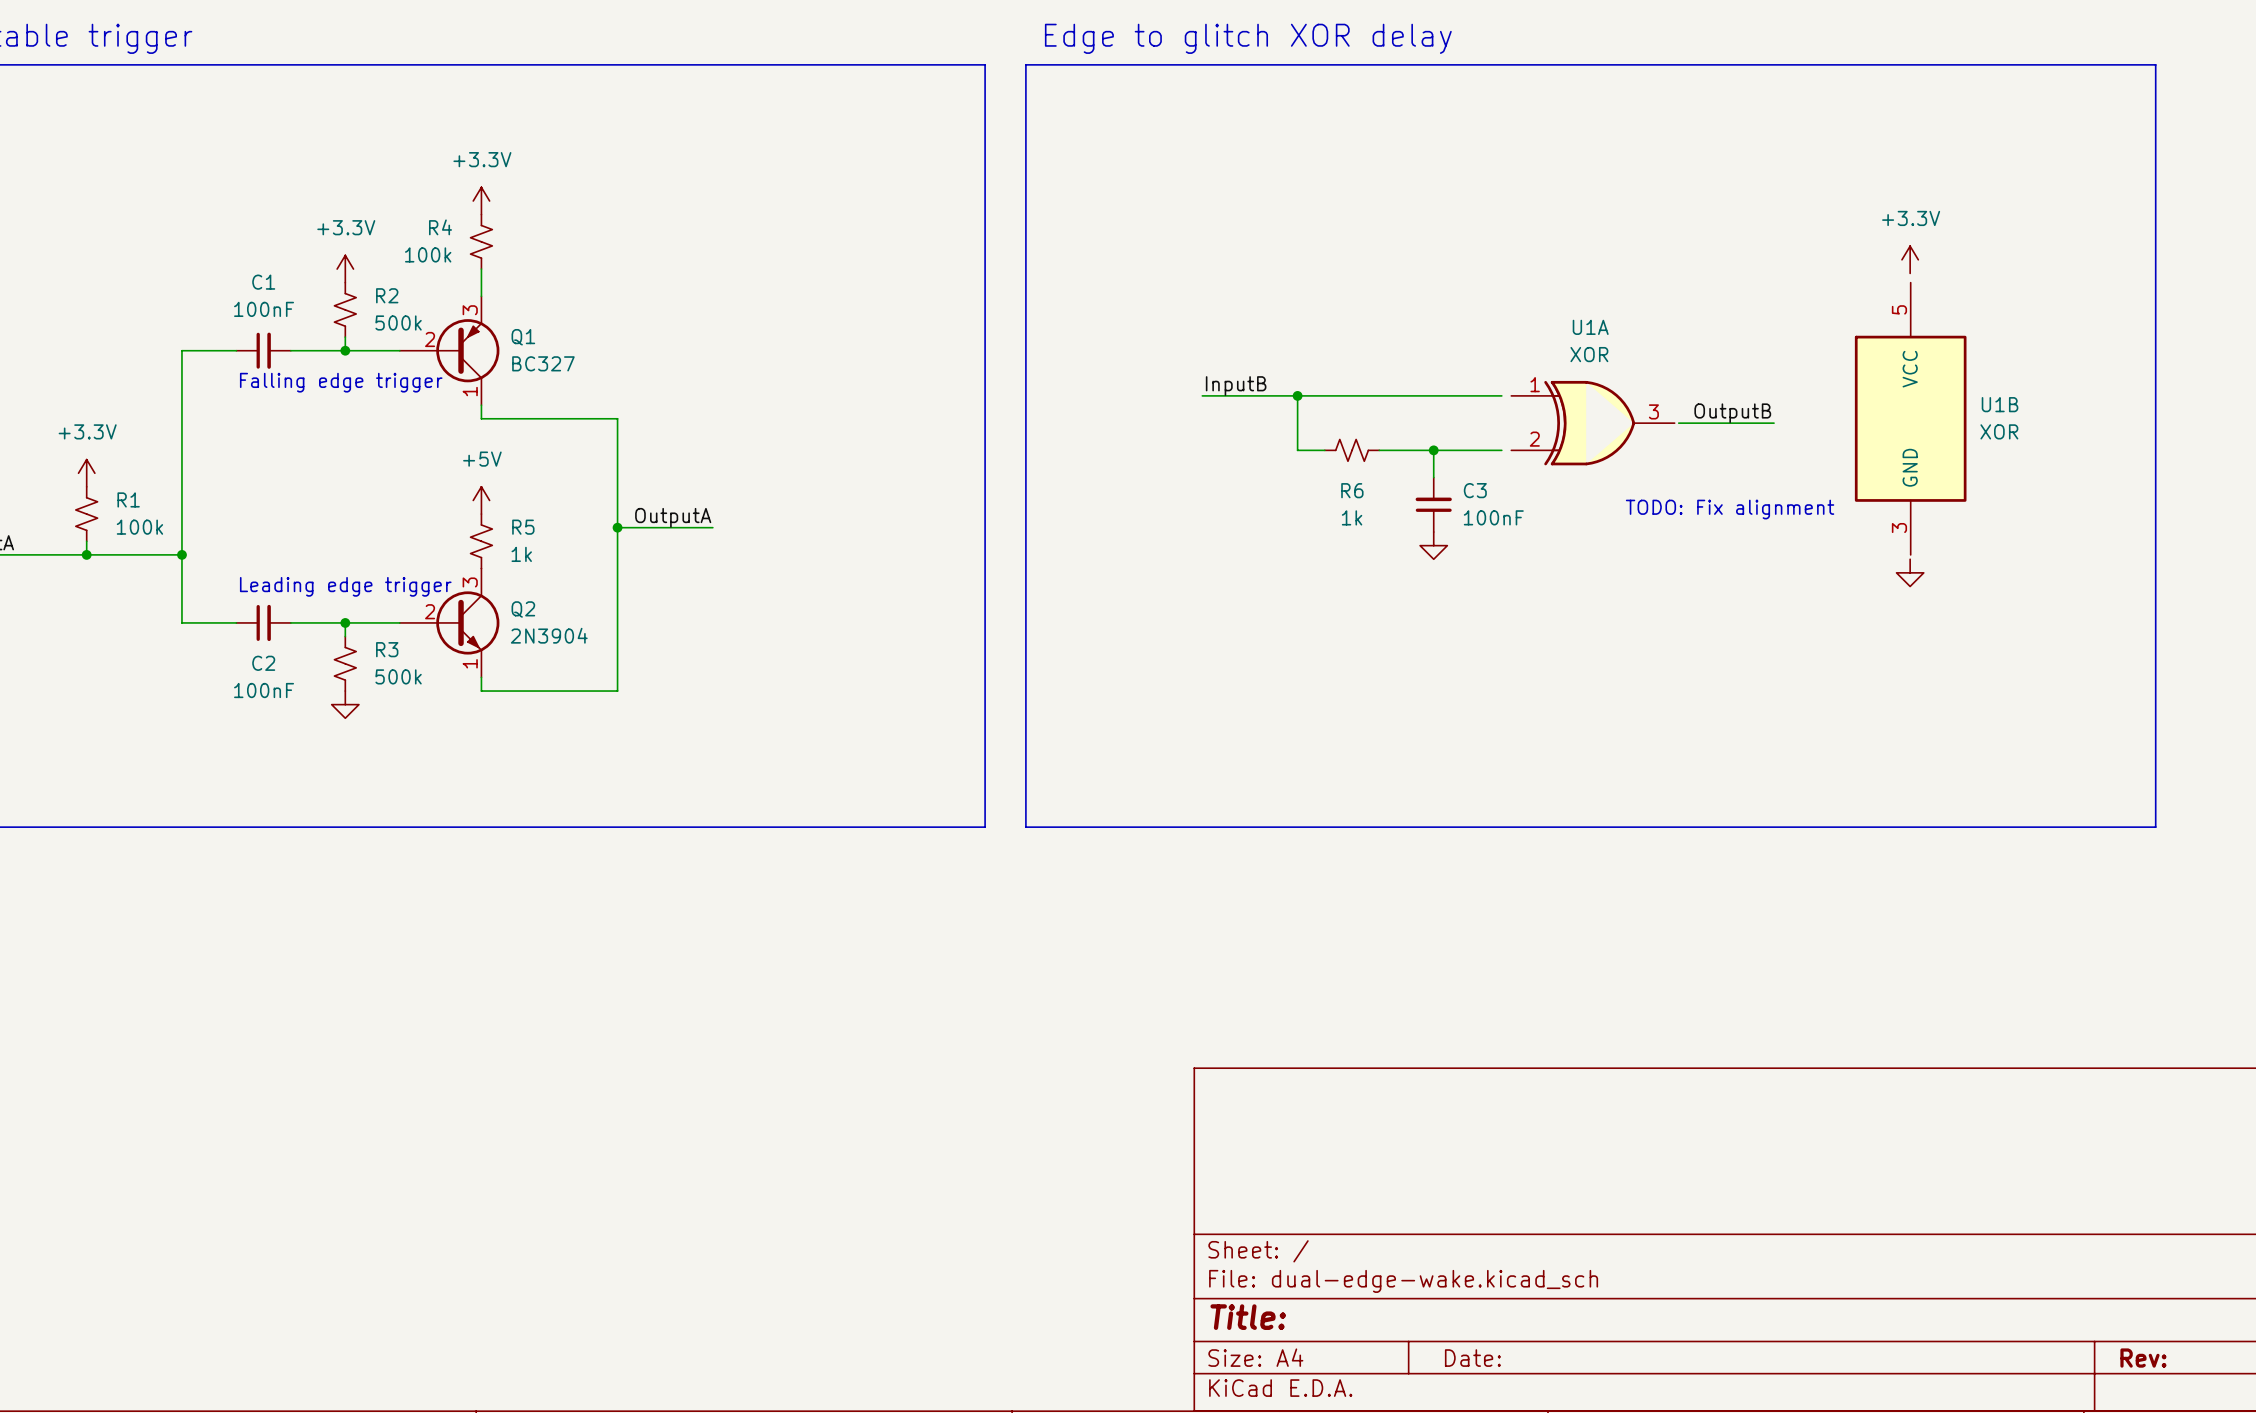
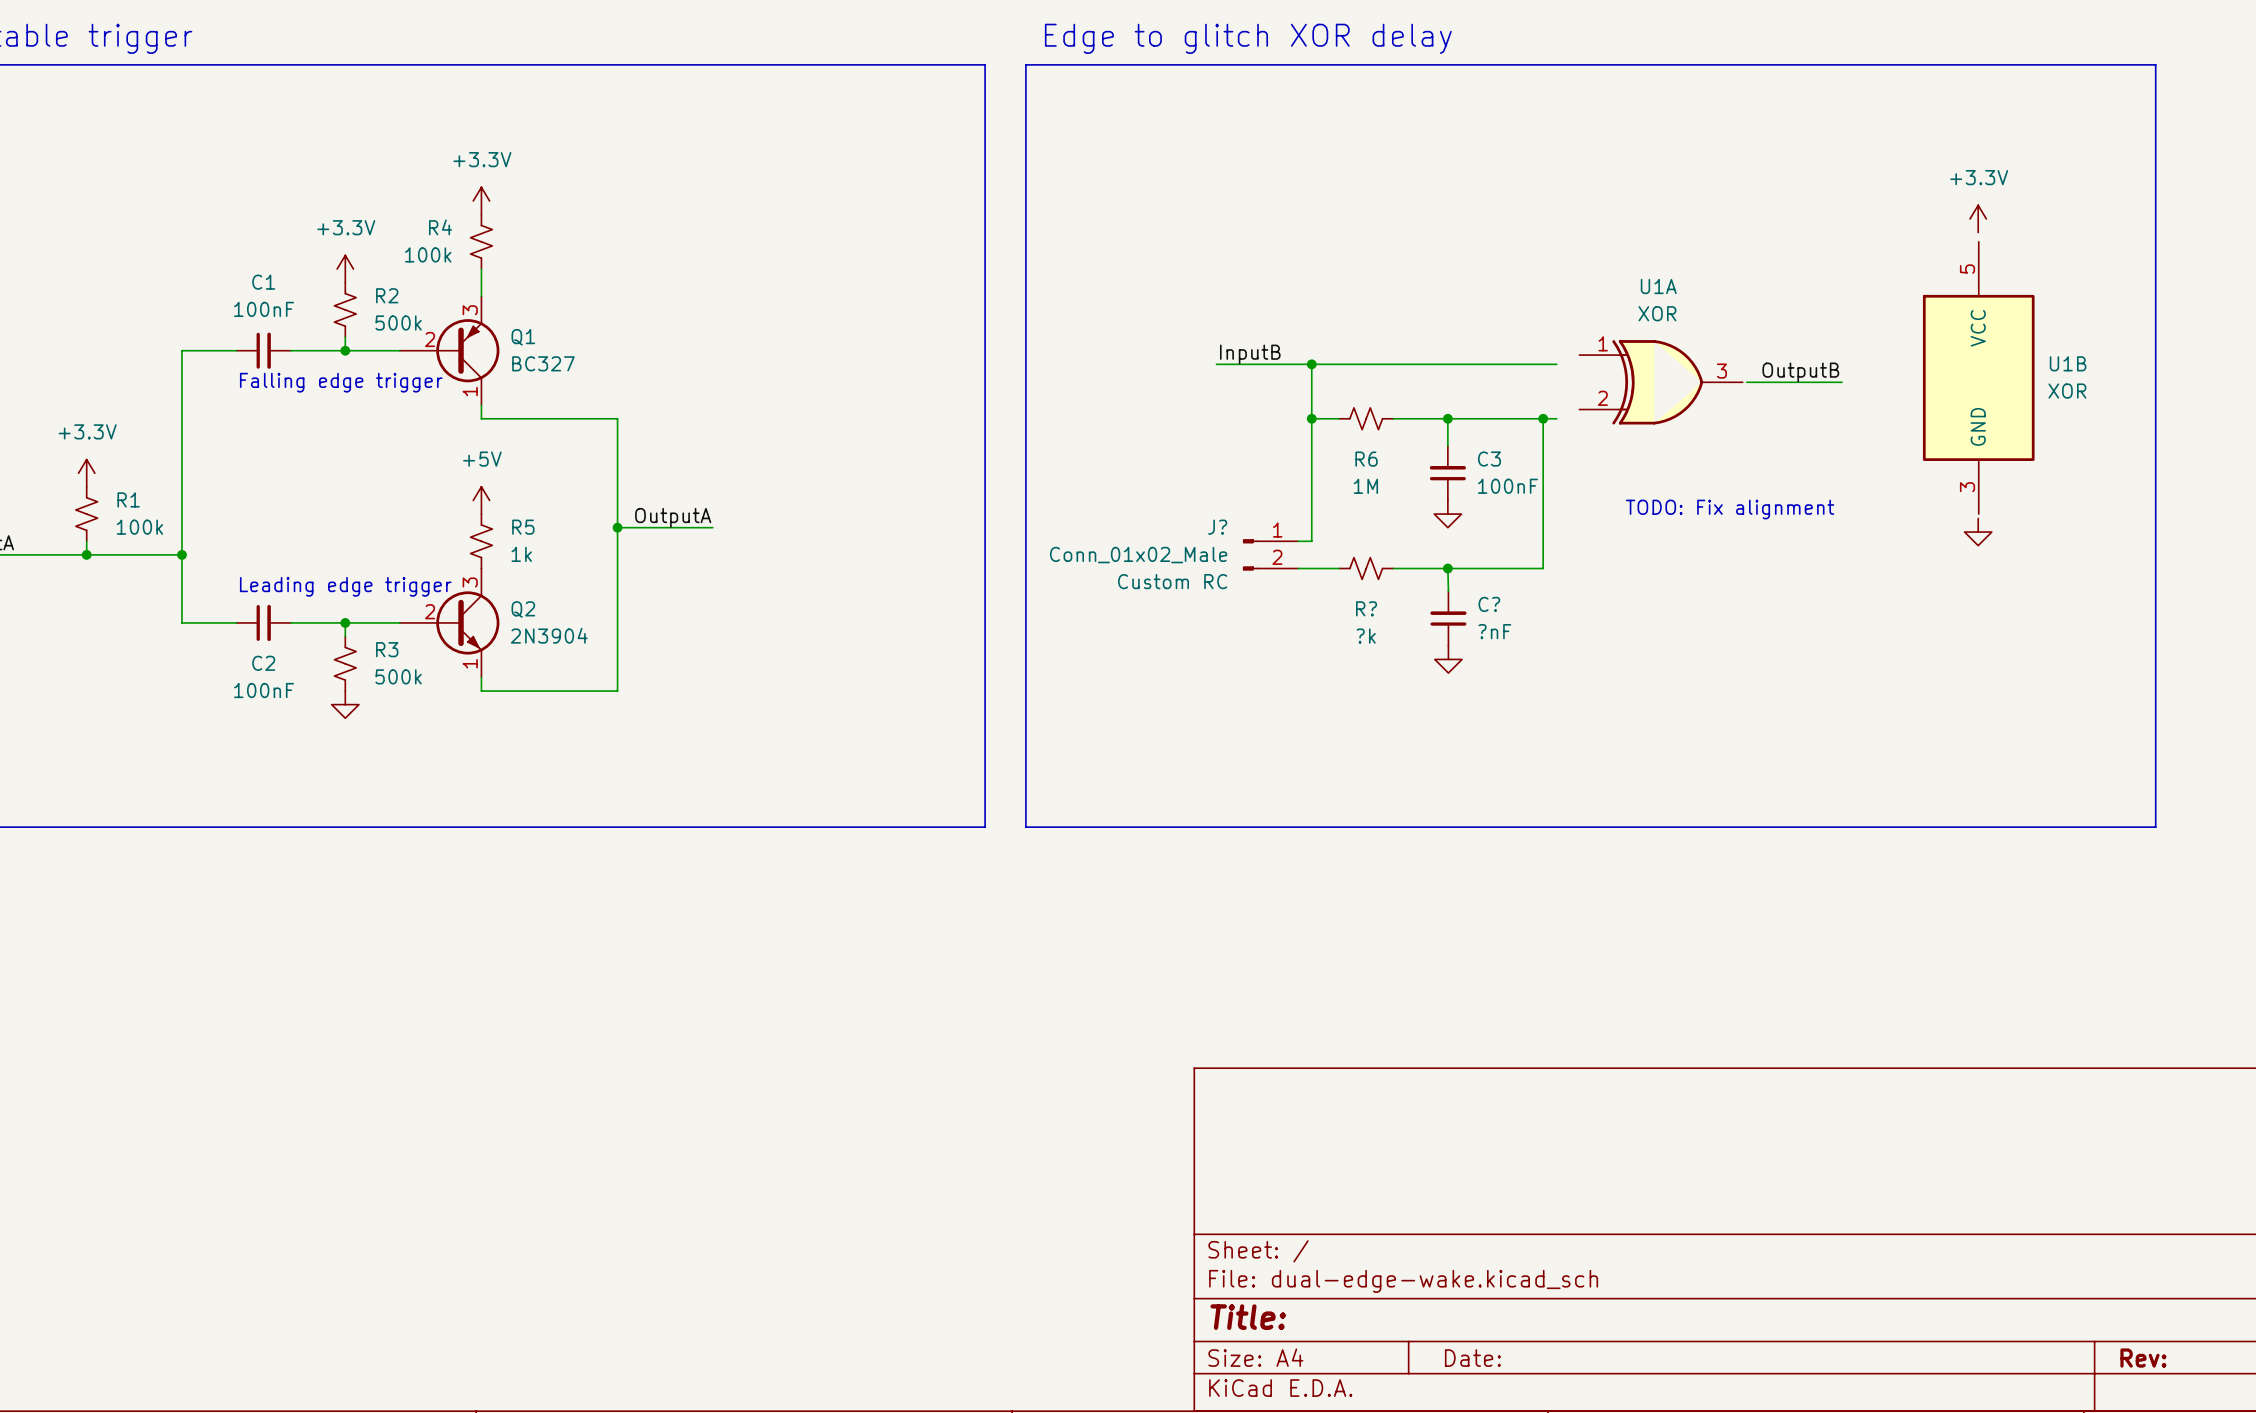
power symbol position: +3.3V (1910, 259) -> +3.3V (1978, 218)
wire: none -> (1216, 364) (1556, 364)
wire: none -> (1311, 364) (1311, 541) (1298, 541)
junction: none -> (1311, 364)
label position: InputB (1236, 386) -> InputB (1250, 354)
wire: (1202, 395) (1501, 395) -> none
wire: (1297, 395) (1297, 450) (1324, 450) -> none
junction: (1297, 395) -> none
label position: OutputB (1732, 413) -> OutputB (1800, 372)
wire: none -> (1311, 418) (1338, 418)
junction: none -> (1311, 418)
wire: none -> (1393, 418) (1556, 418)
wire: none -> (1543, 418) (1543, 568) (1393, 568)
junction: none -> (1543, 418)
U1B position: (1910, 418) -> (1978, 377)
U1A position: (1592, 423) -> (1661, 382)
wire: (1678, 423) (1774, 423) -> (1746, 382) (1842, 382)
R6 position: (1352, 450) -> (1366, 418)
wire: (1379, 450) (1501, 450) -> none
wire: (1433, 450) (1433, 477) -> (1447, 418) (1447, 446)
junction position: (1433, 450) -> (1447, 418)
C3 position: (1433, 504) -> (1447, 473)
R6 value: 1k (1352, 517) -> 1M (1365, 486)
power symbol position: (1433, 545) -> (1447, 514)
J?: none -> Conn_01x02_Male (1270, 554)
wire: none -> (1298, 568) (1338, 568)
R?: none -> ?k (1366, 568)
wire: none -> (1447, 568) (1448, 591)
junction: none -> (1447, 568)
power symbol position: (1910, 572) -> (1978, 532)
C?: none -> ?nF (1448, 618)
power symbol: none -> (1448, 659)

